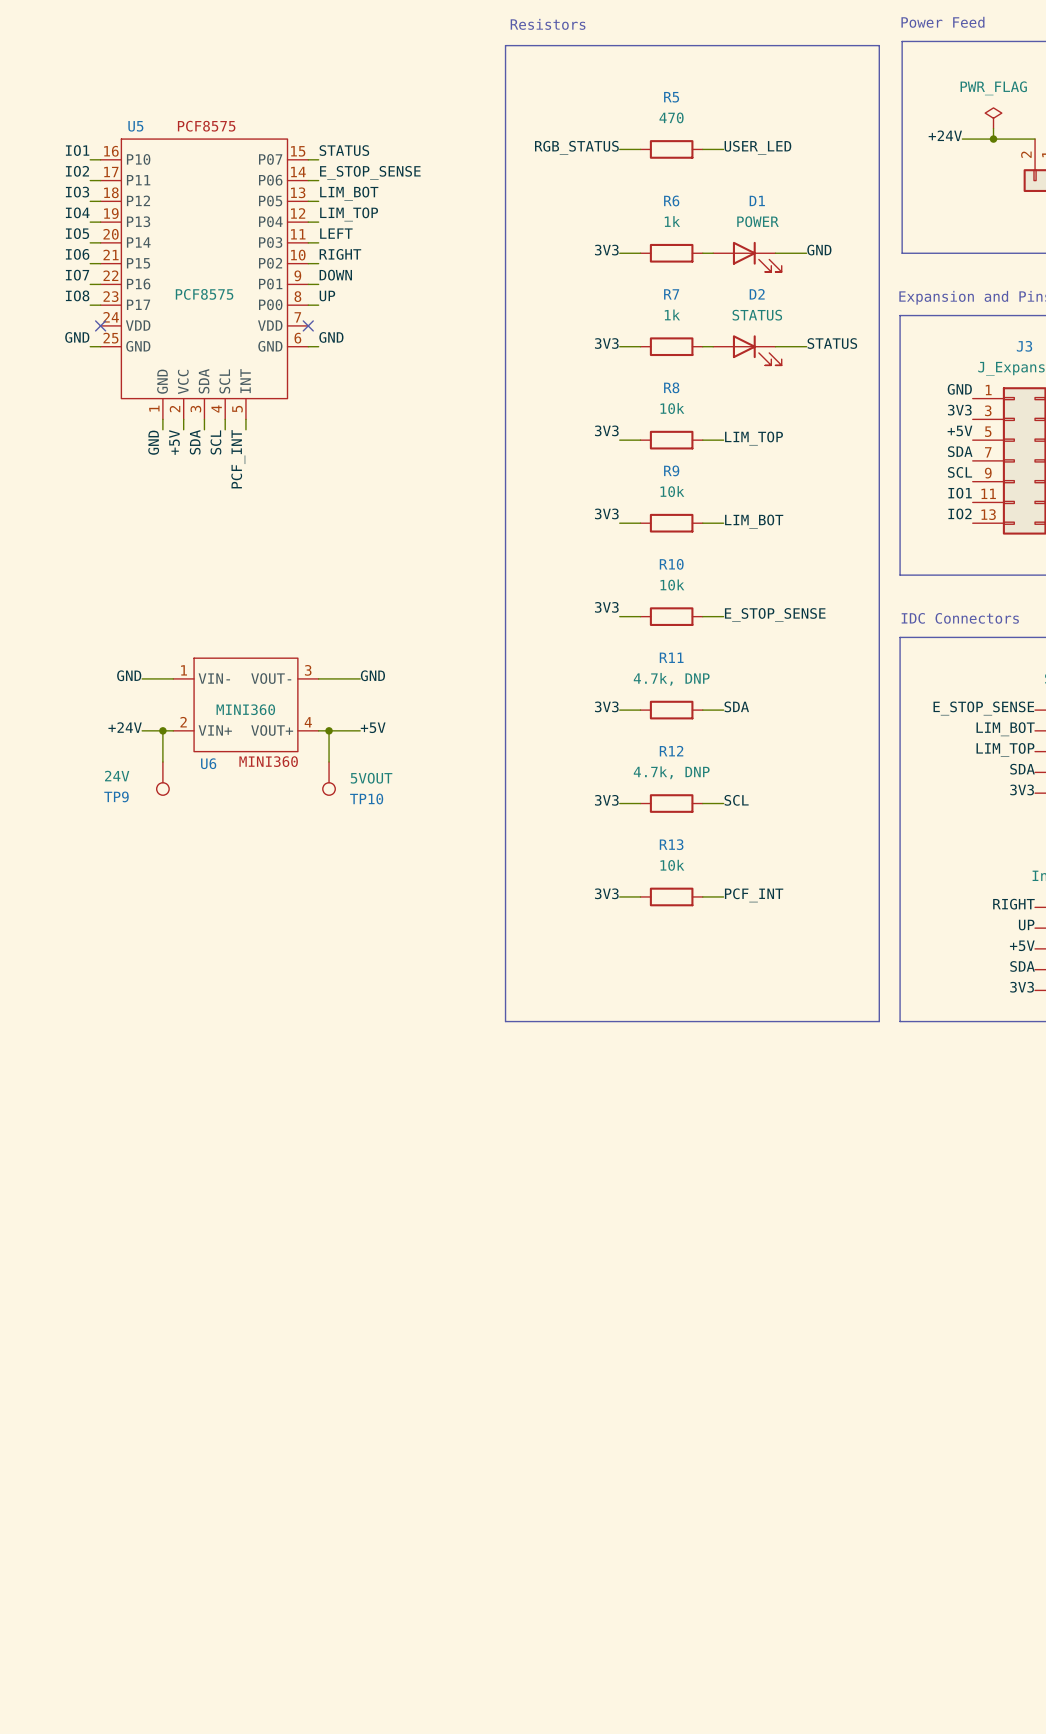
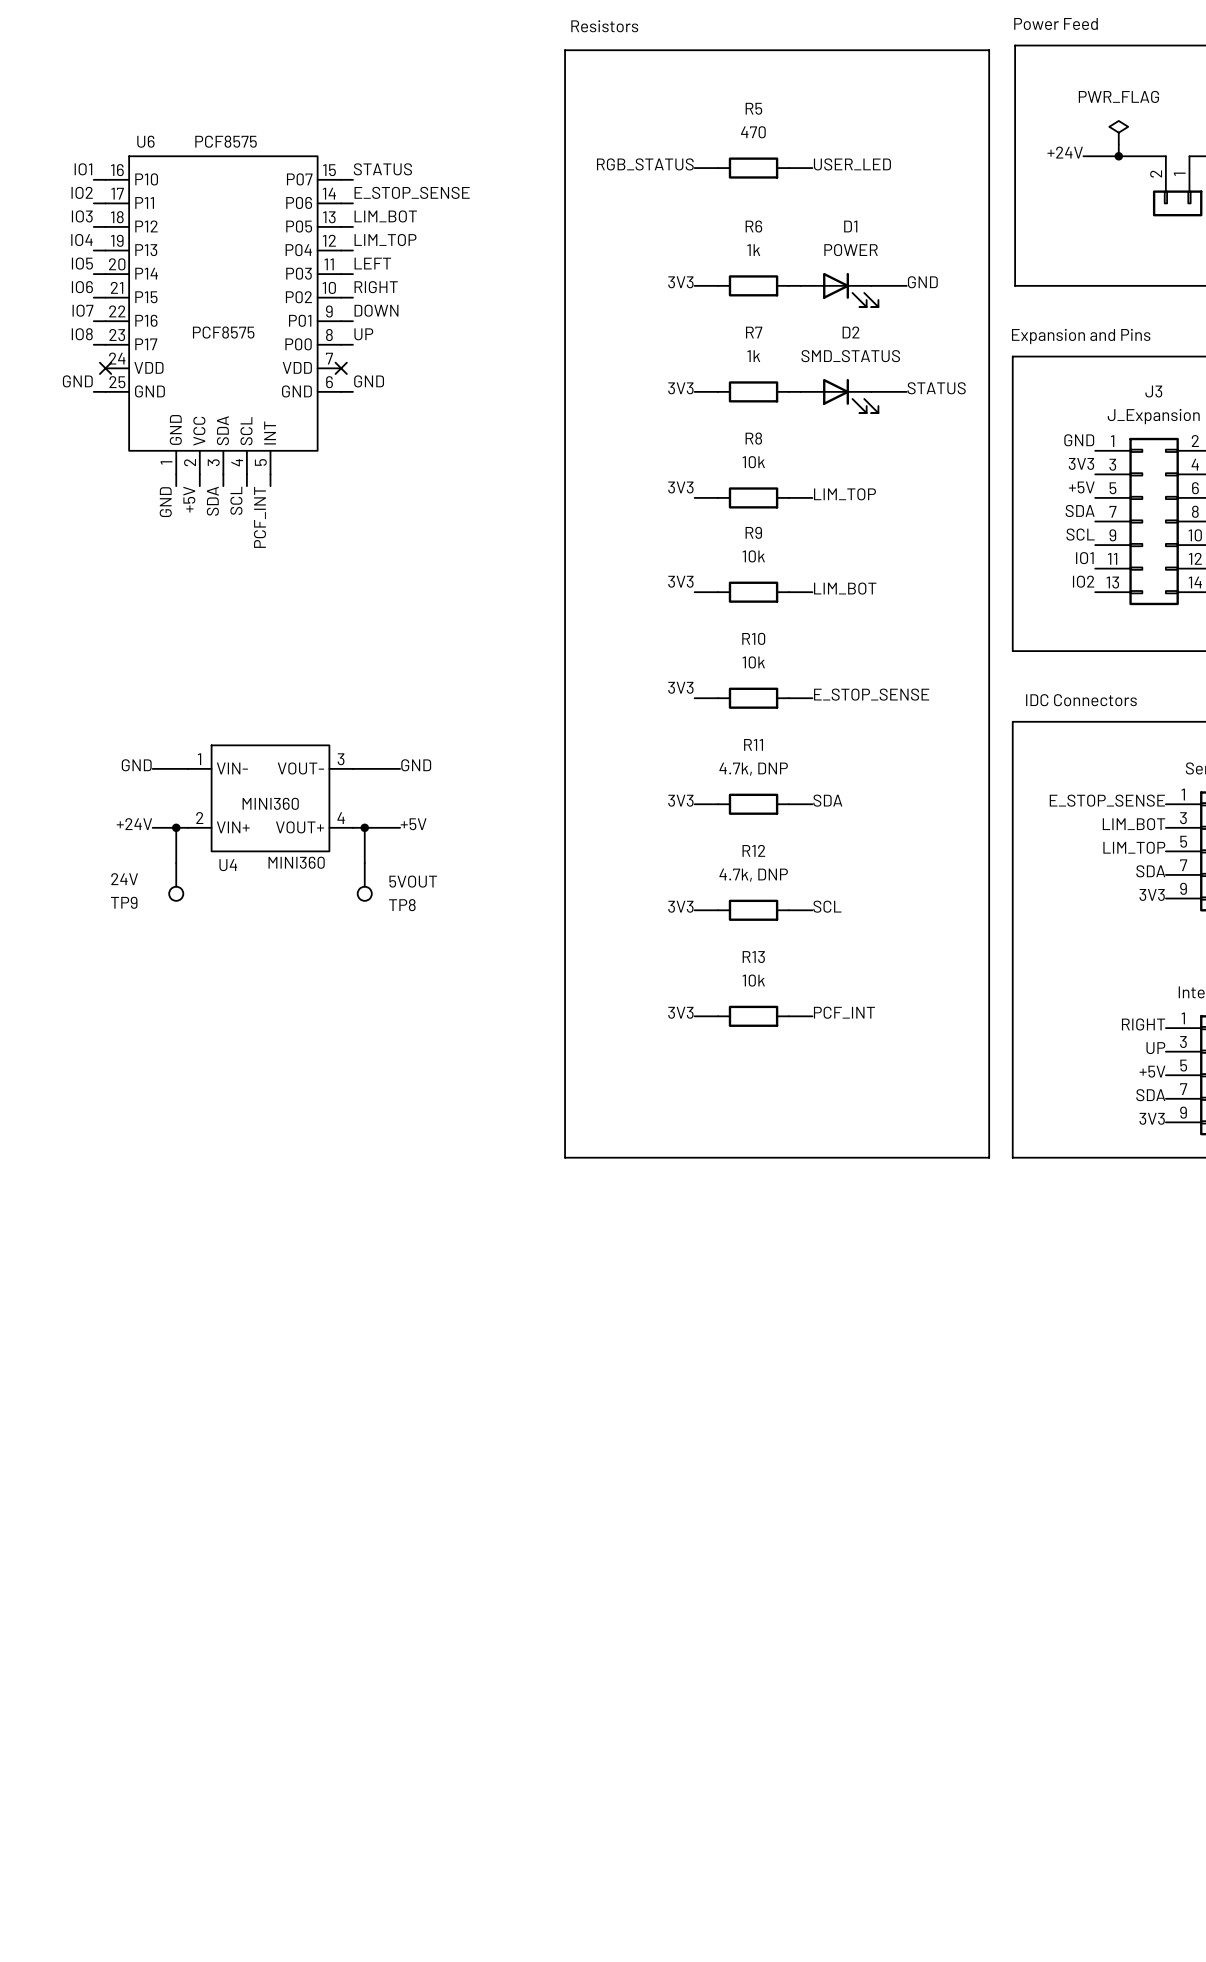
U5 name: U5 (135, 126) -> U6 (145, 141)
D2 value: STATUS (757, 315) -> SMD_STATUS (850, 356)
U6 name: U6 (208, 763) -> U4 (228, 865)
TP10 name: TP10 (366, 798) -> TP8 (402, 905)

